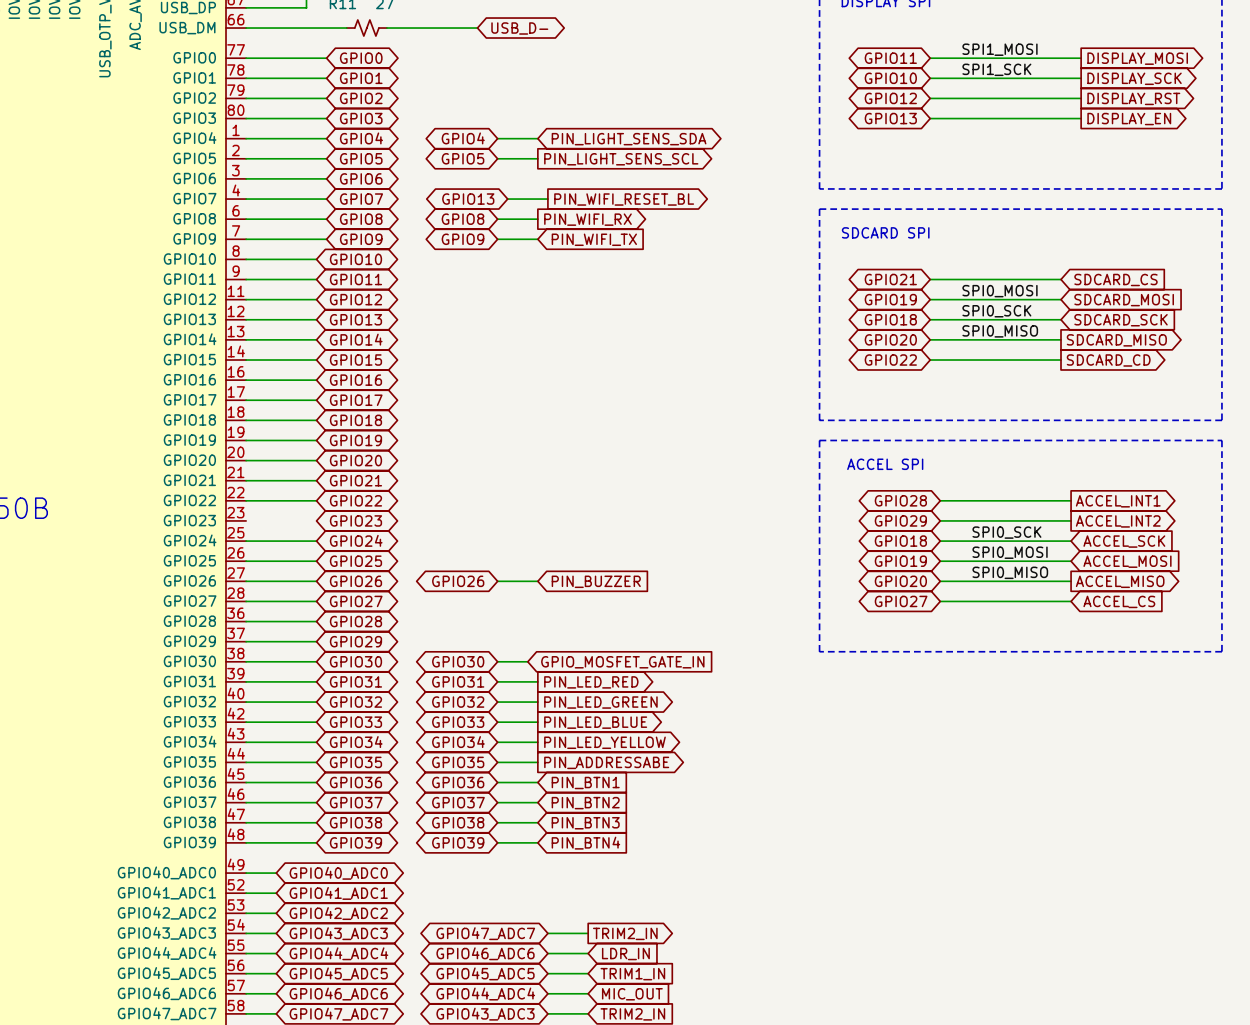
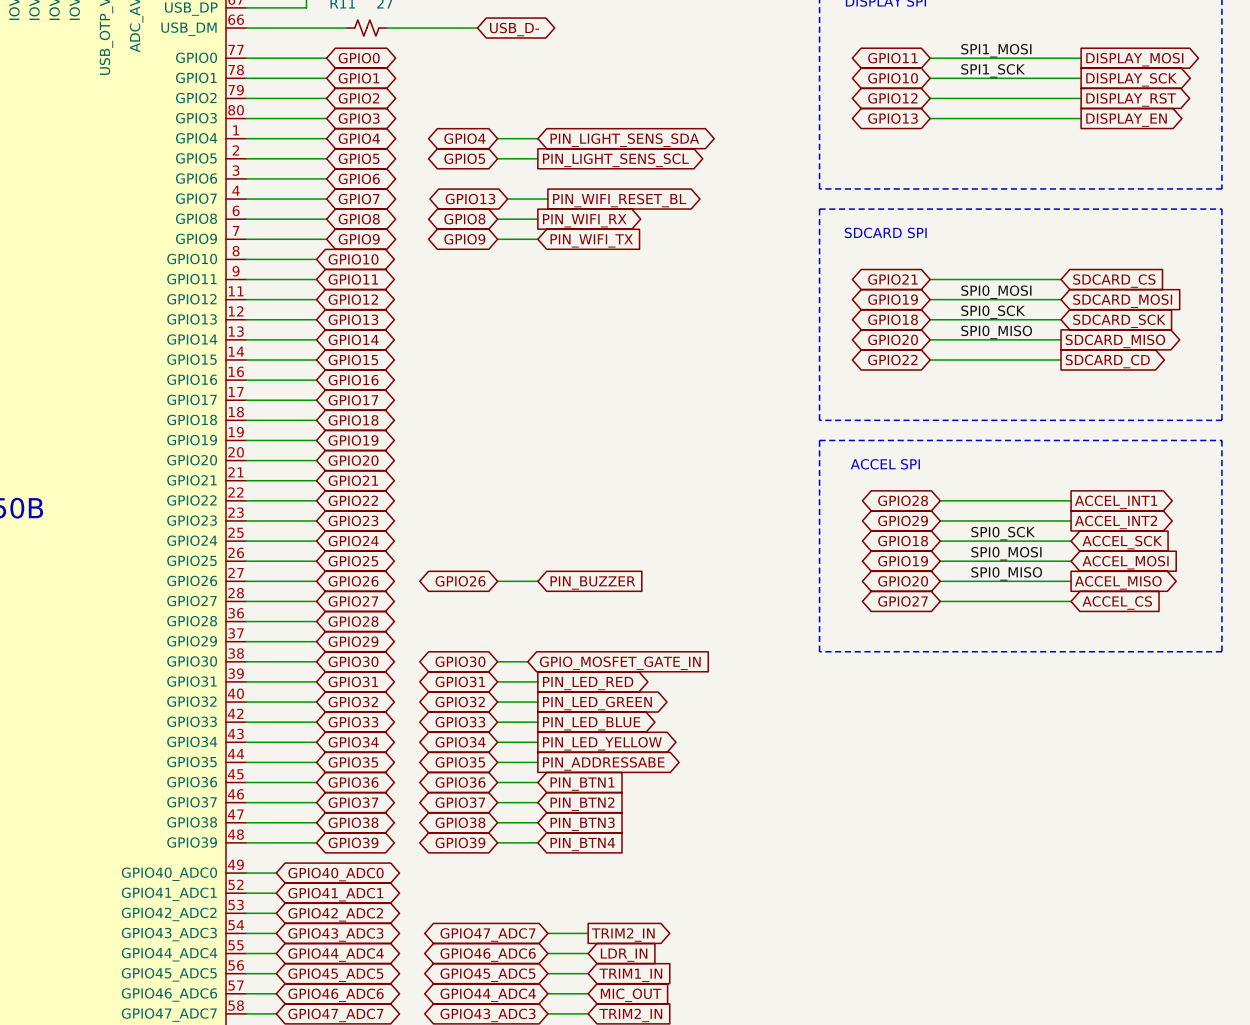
wire: none -> (246, 520) (316, 520)

